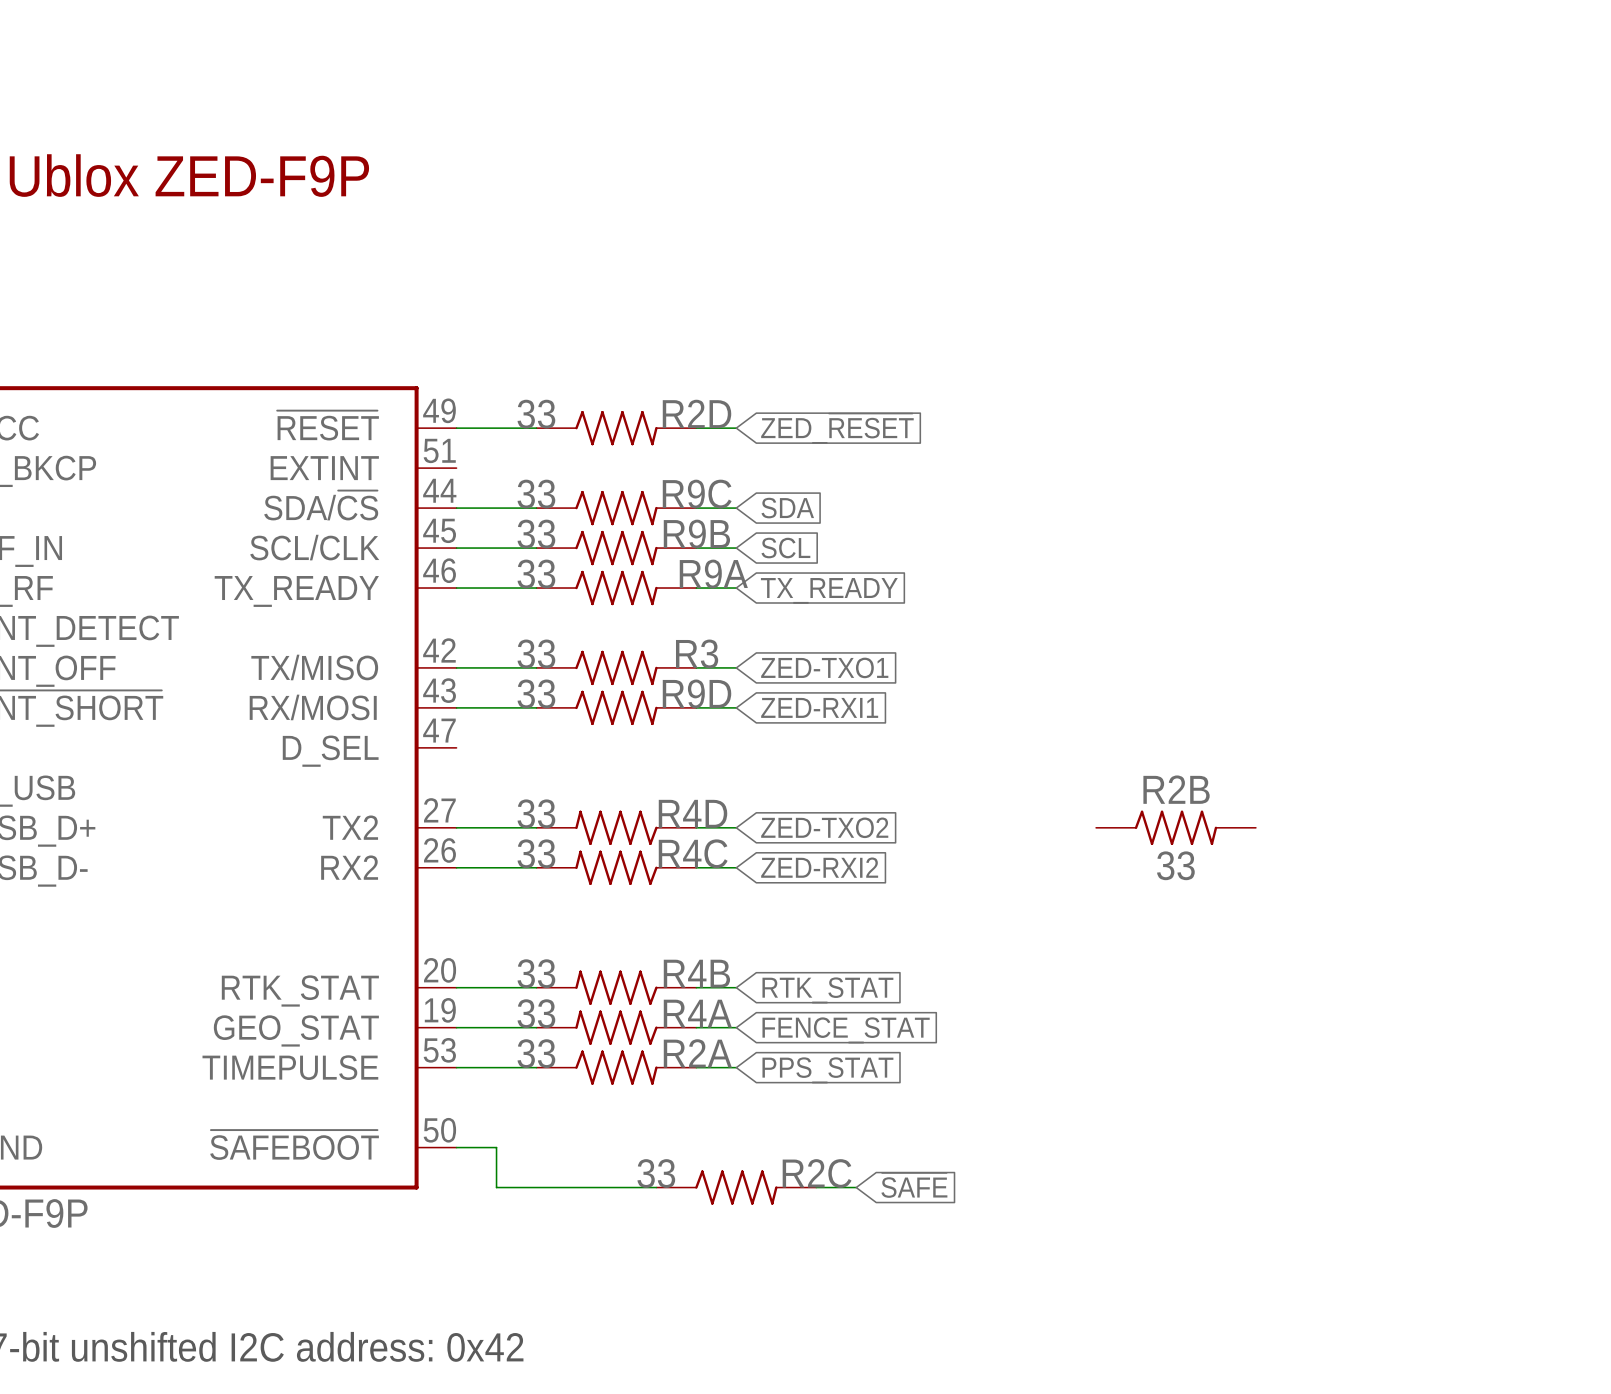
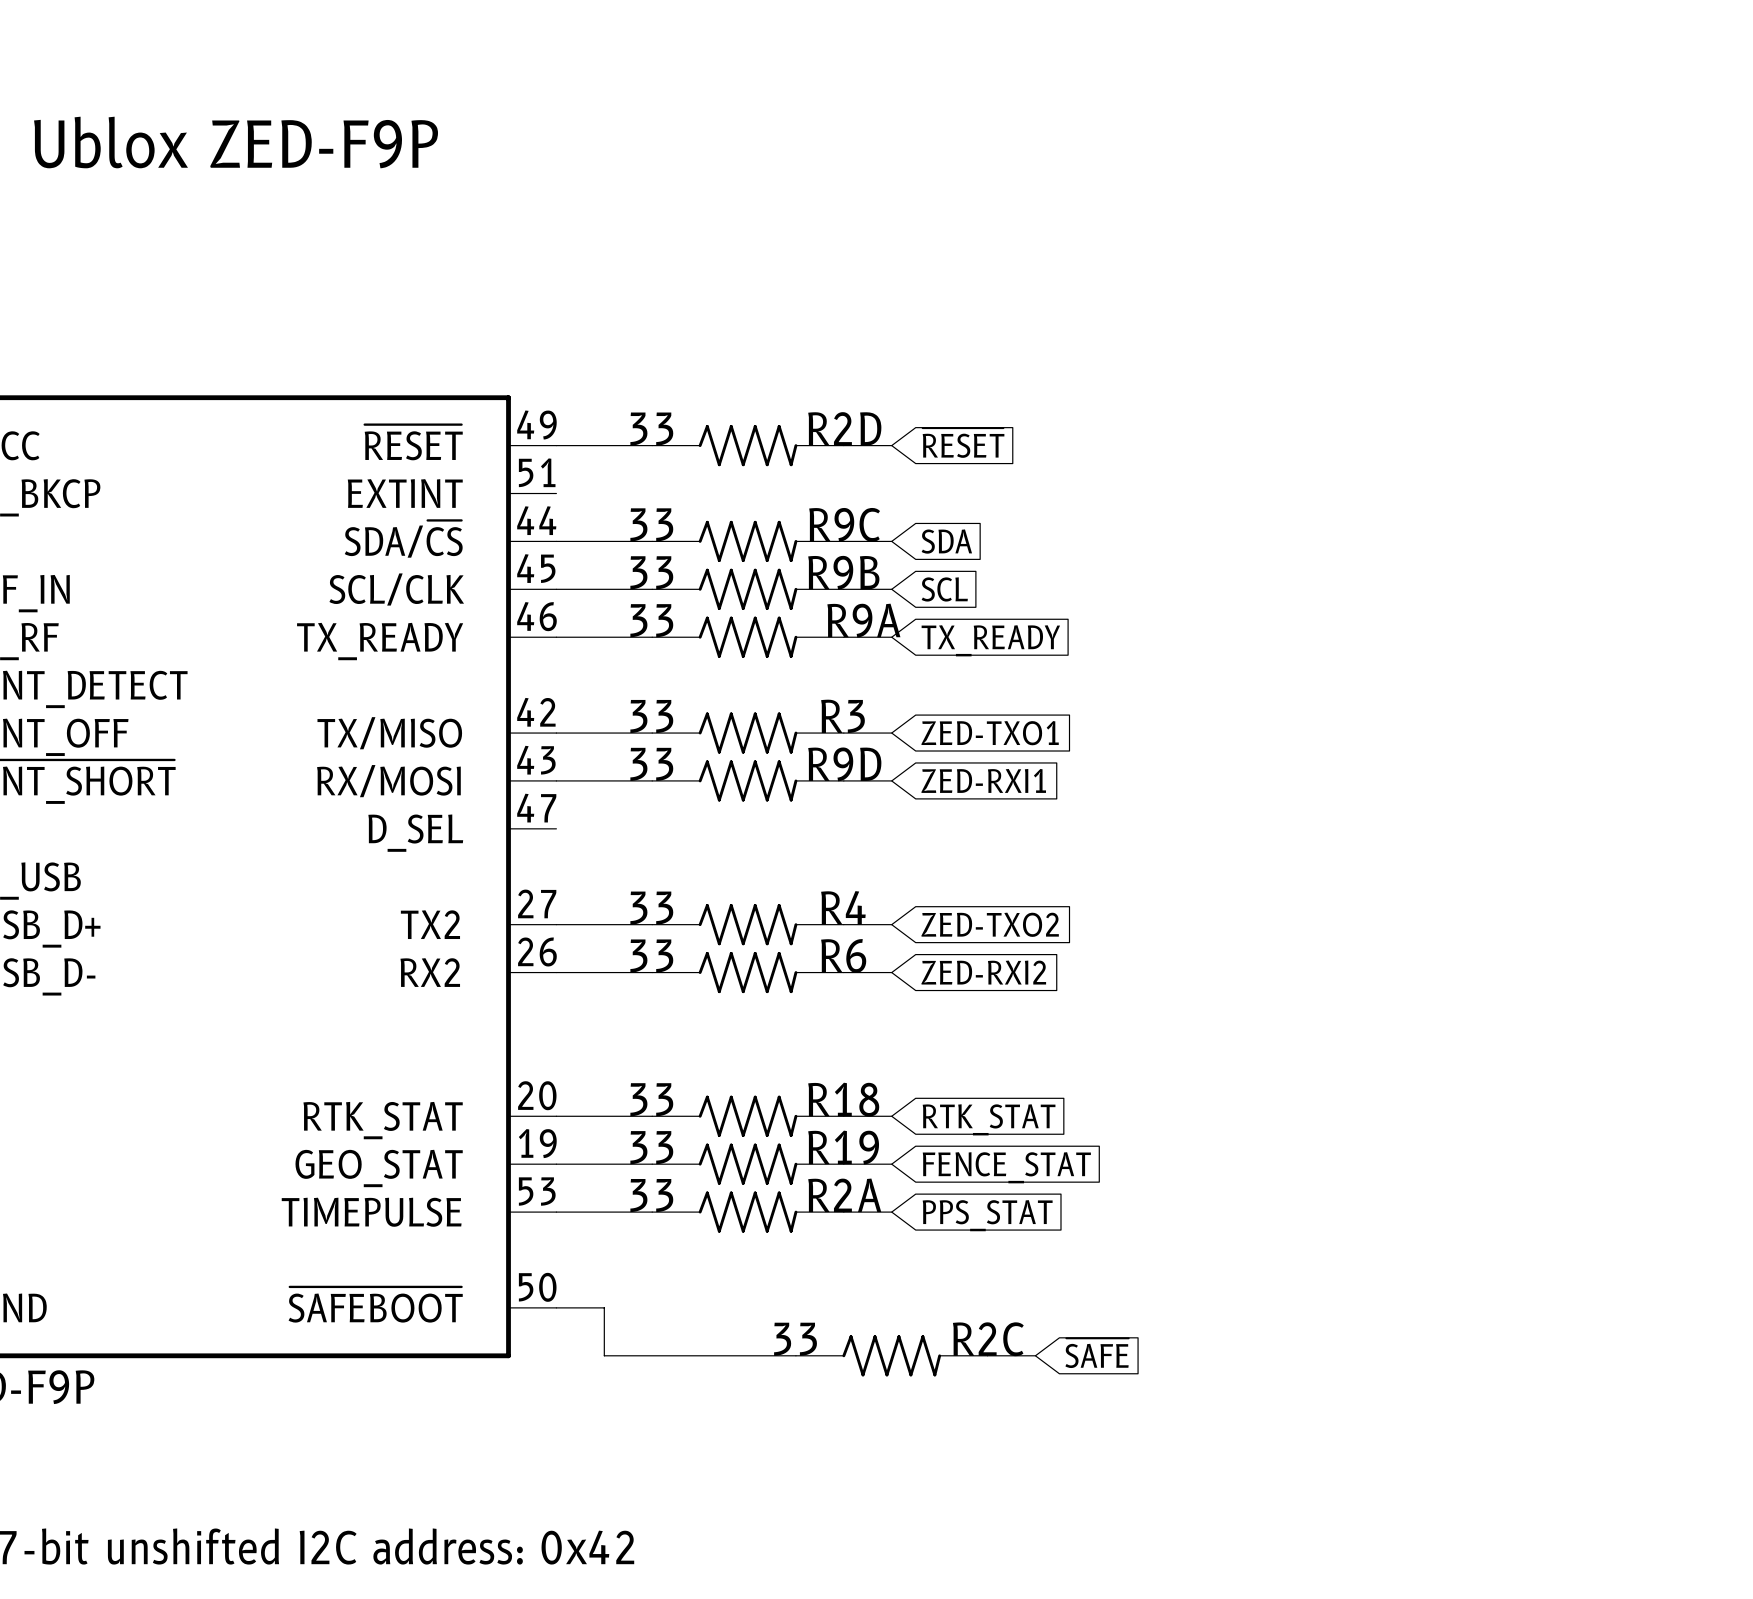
global label: ZED_~{RESET} (837, 428) -> ~{RESET} (963, 442)
R4D: 33 (616, 827) -> none
R4: none -> 33 (748, 924)
R2B: 33 (1176, 827) -> none
R4C: 33 (616, 867) -> none
R6: none -> 33 (748, 972)
R4B: 33 (616, 987) -> none
R18: none -> 33 (748, 1116)
R4A: 33 (616, 1027) -> none
R19: none -> 33 (748, 1164)

